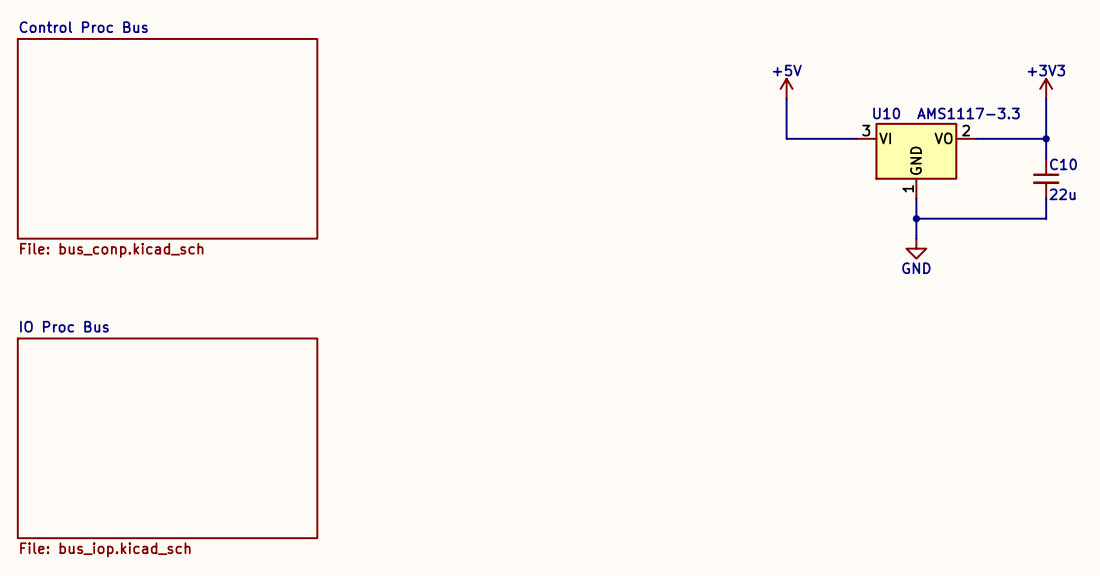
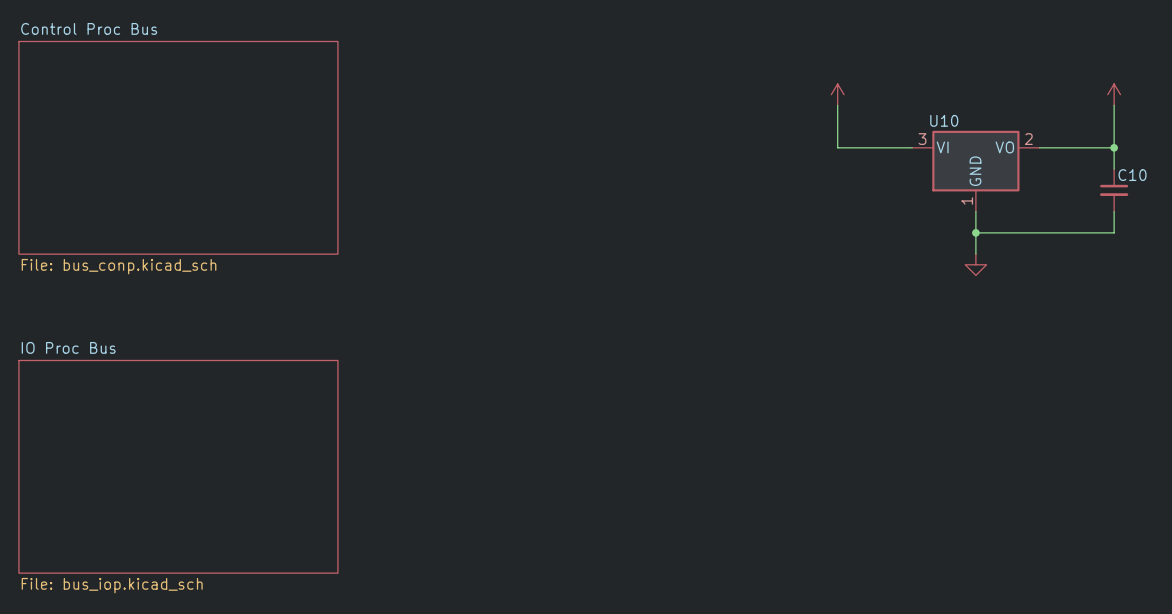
power symbol text: +5V (787, 70) -> none
power symbol text: +3V3 (1046, 70) -> none
U10 value: AMS1117-3.3 (968, 113) -> none
C10 value: 22u (1062, 194) -> none
power symbol text: GND (916, 268) -> none

